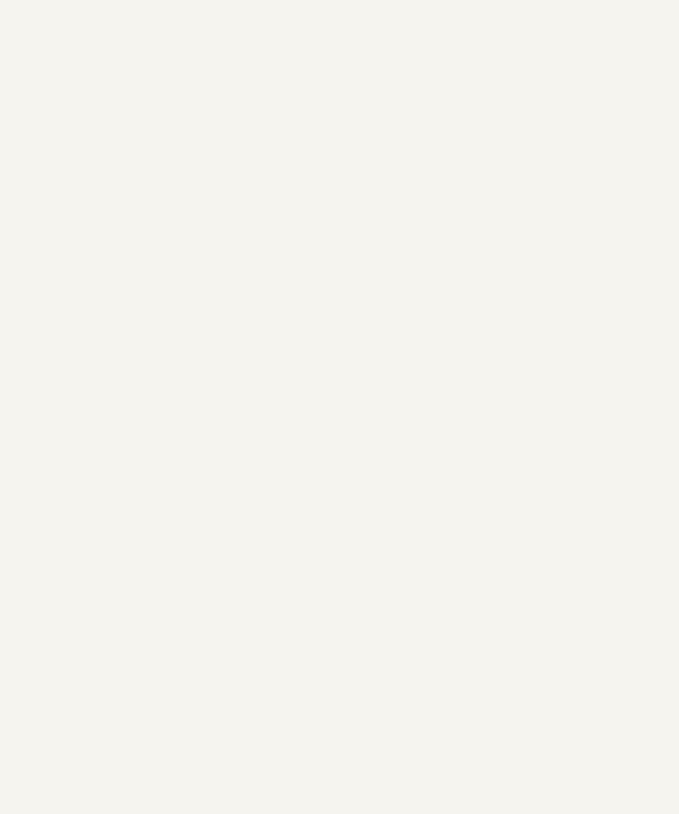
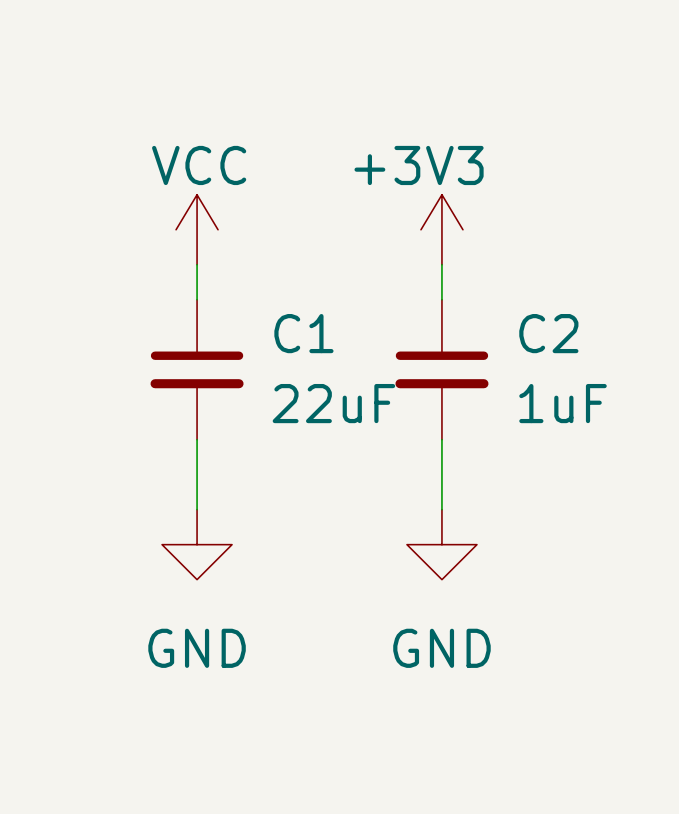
power symbol: none -> VCC (197, 229)
power symbol: none -> +3V3 (441, 229)
wire: none -> (197, 264) (197, 299)
wire: none -> (441, 264) (441, 299)
C1: none -> 22uF (197, 369)
C2: none -> 1uF (441, 369)
wire: none -> (197, 439) (197, 509)
wire: none -> (441, 439) (441, 509)
power symbol: none -> GND (197, 544)
power symbol: none -> GND (441, 544)

